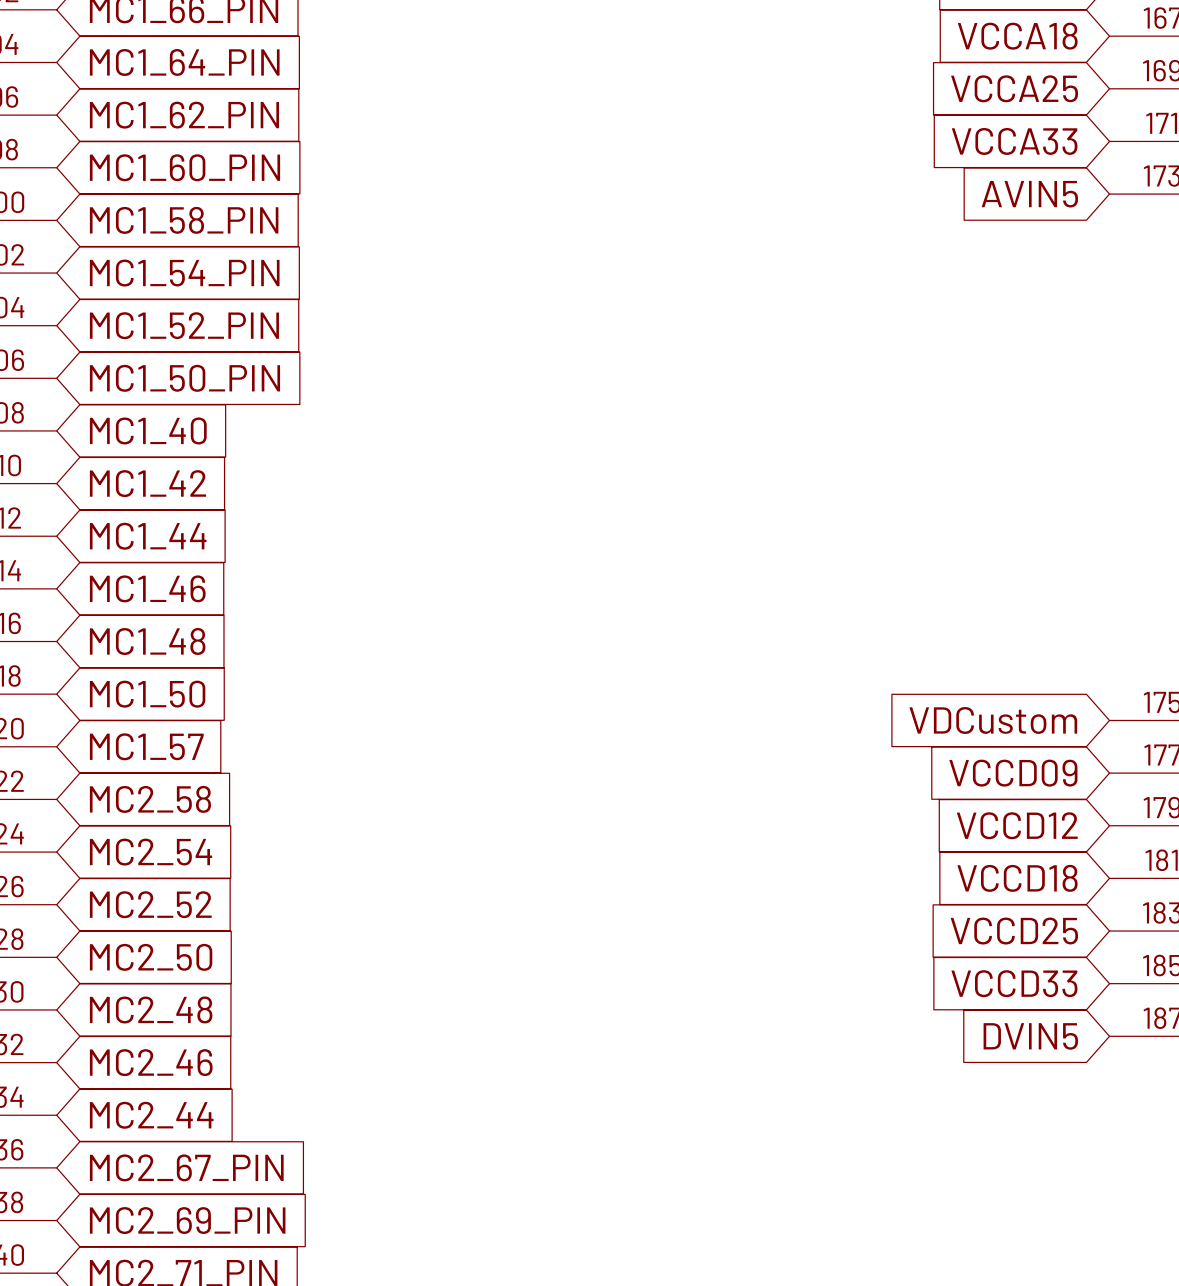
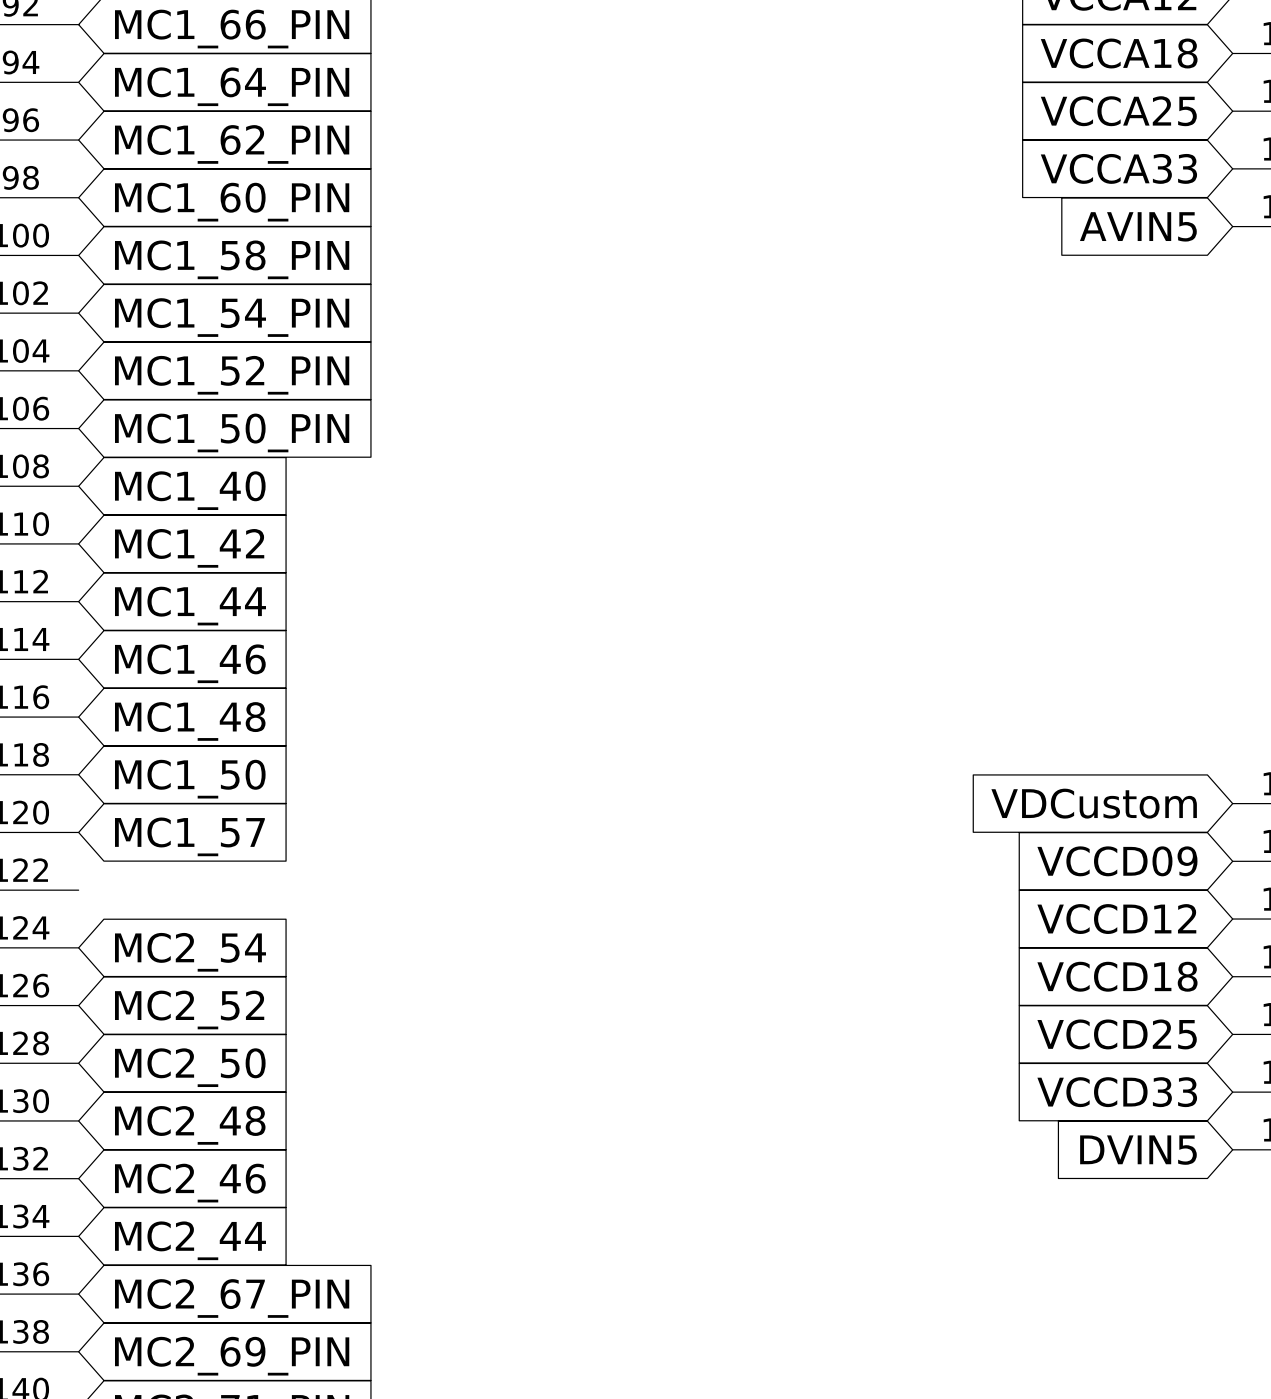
global label: MC2_58 (150, 799) -> none

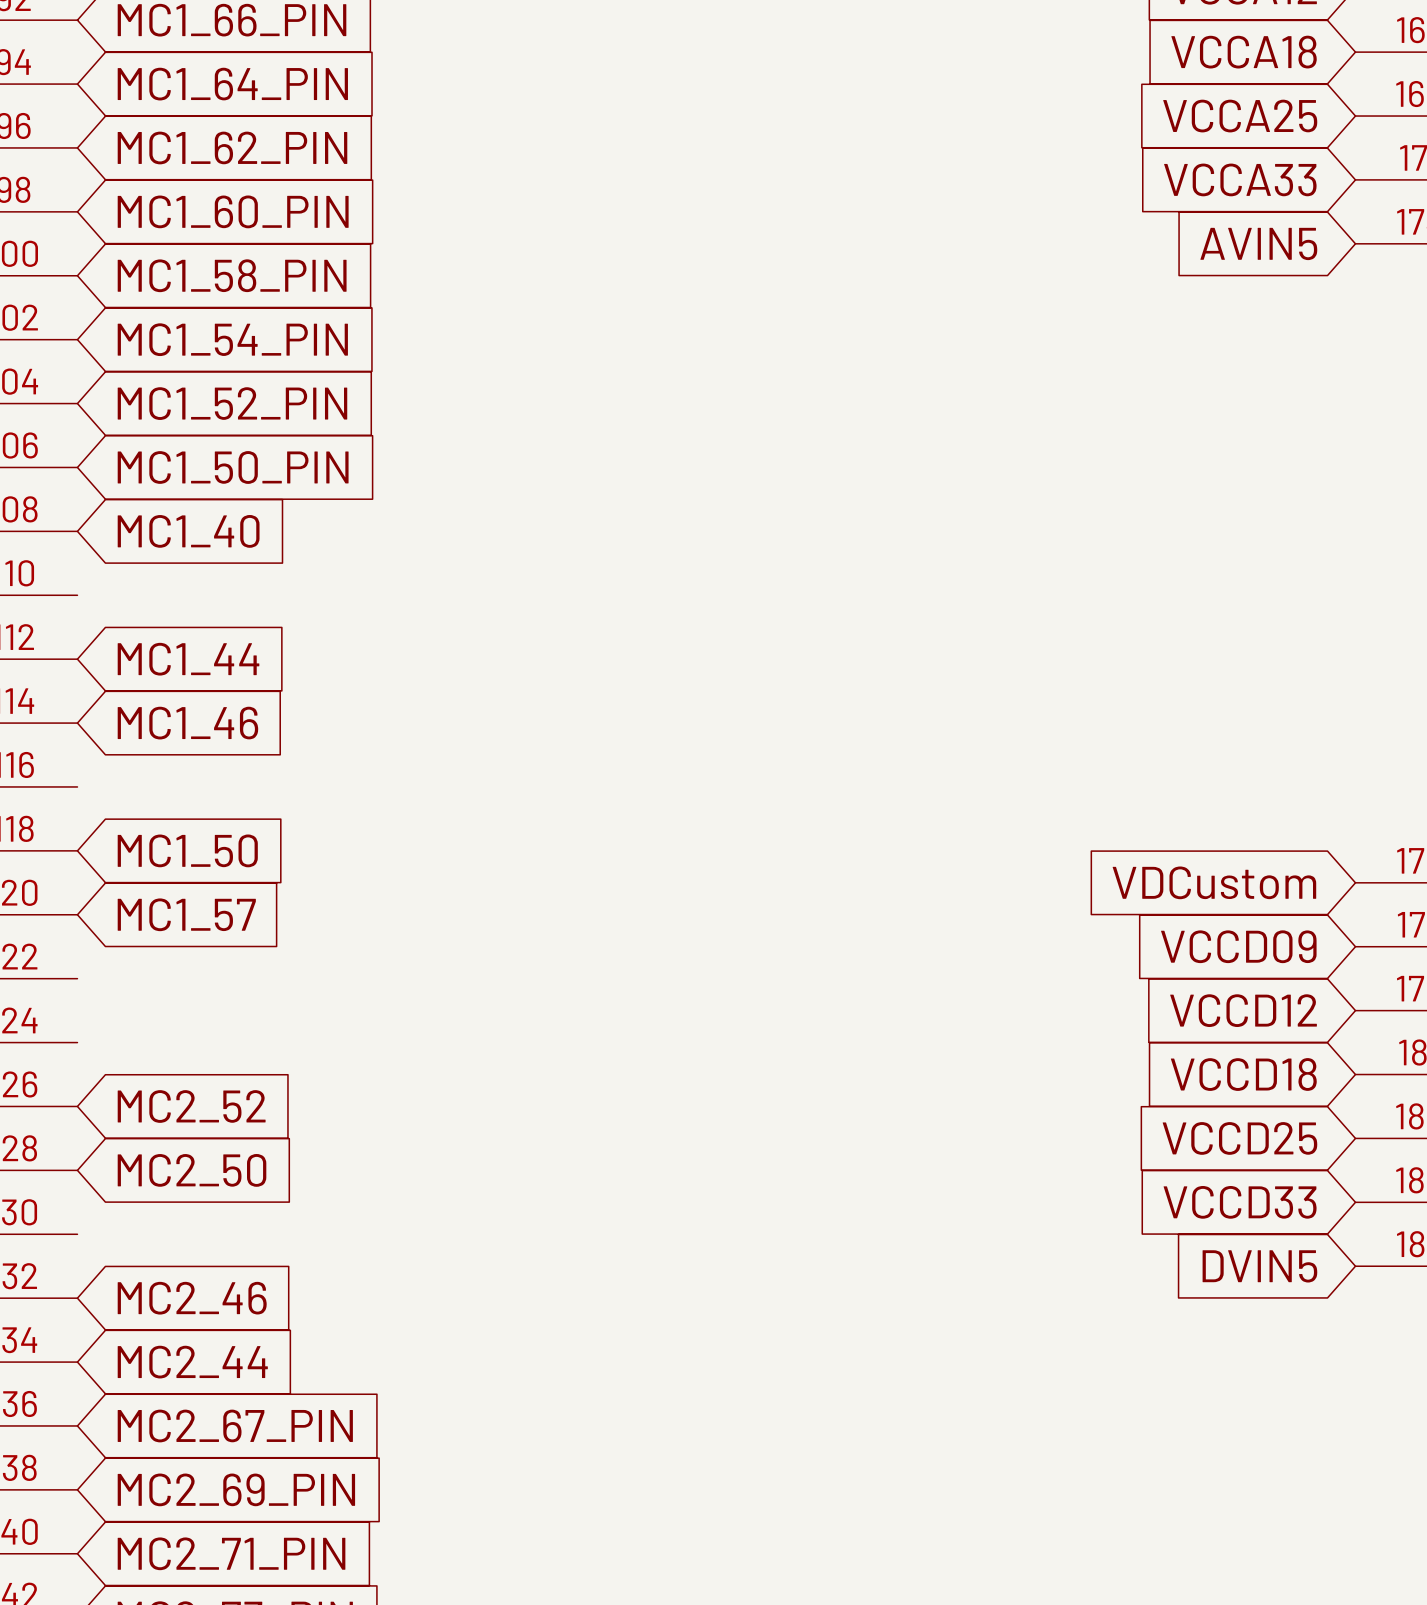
global label: MC1_42 (189, 548) -> none
global label: MC1_48 (190, 721) -> none
global label: MC2_54 (190, 952) -> none
global label: MC2_48 (190, 1125) -> none

